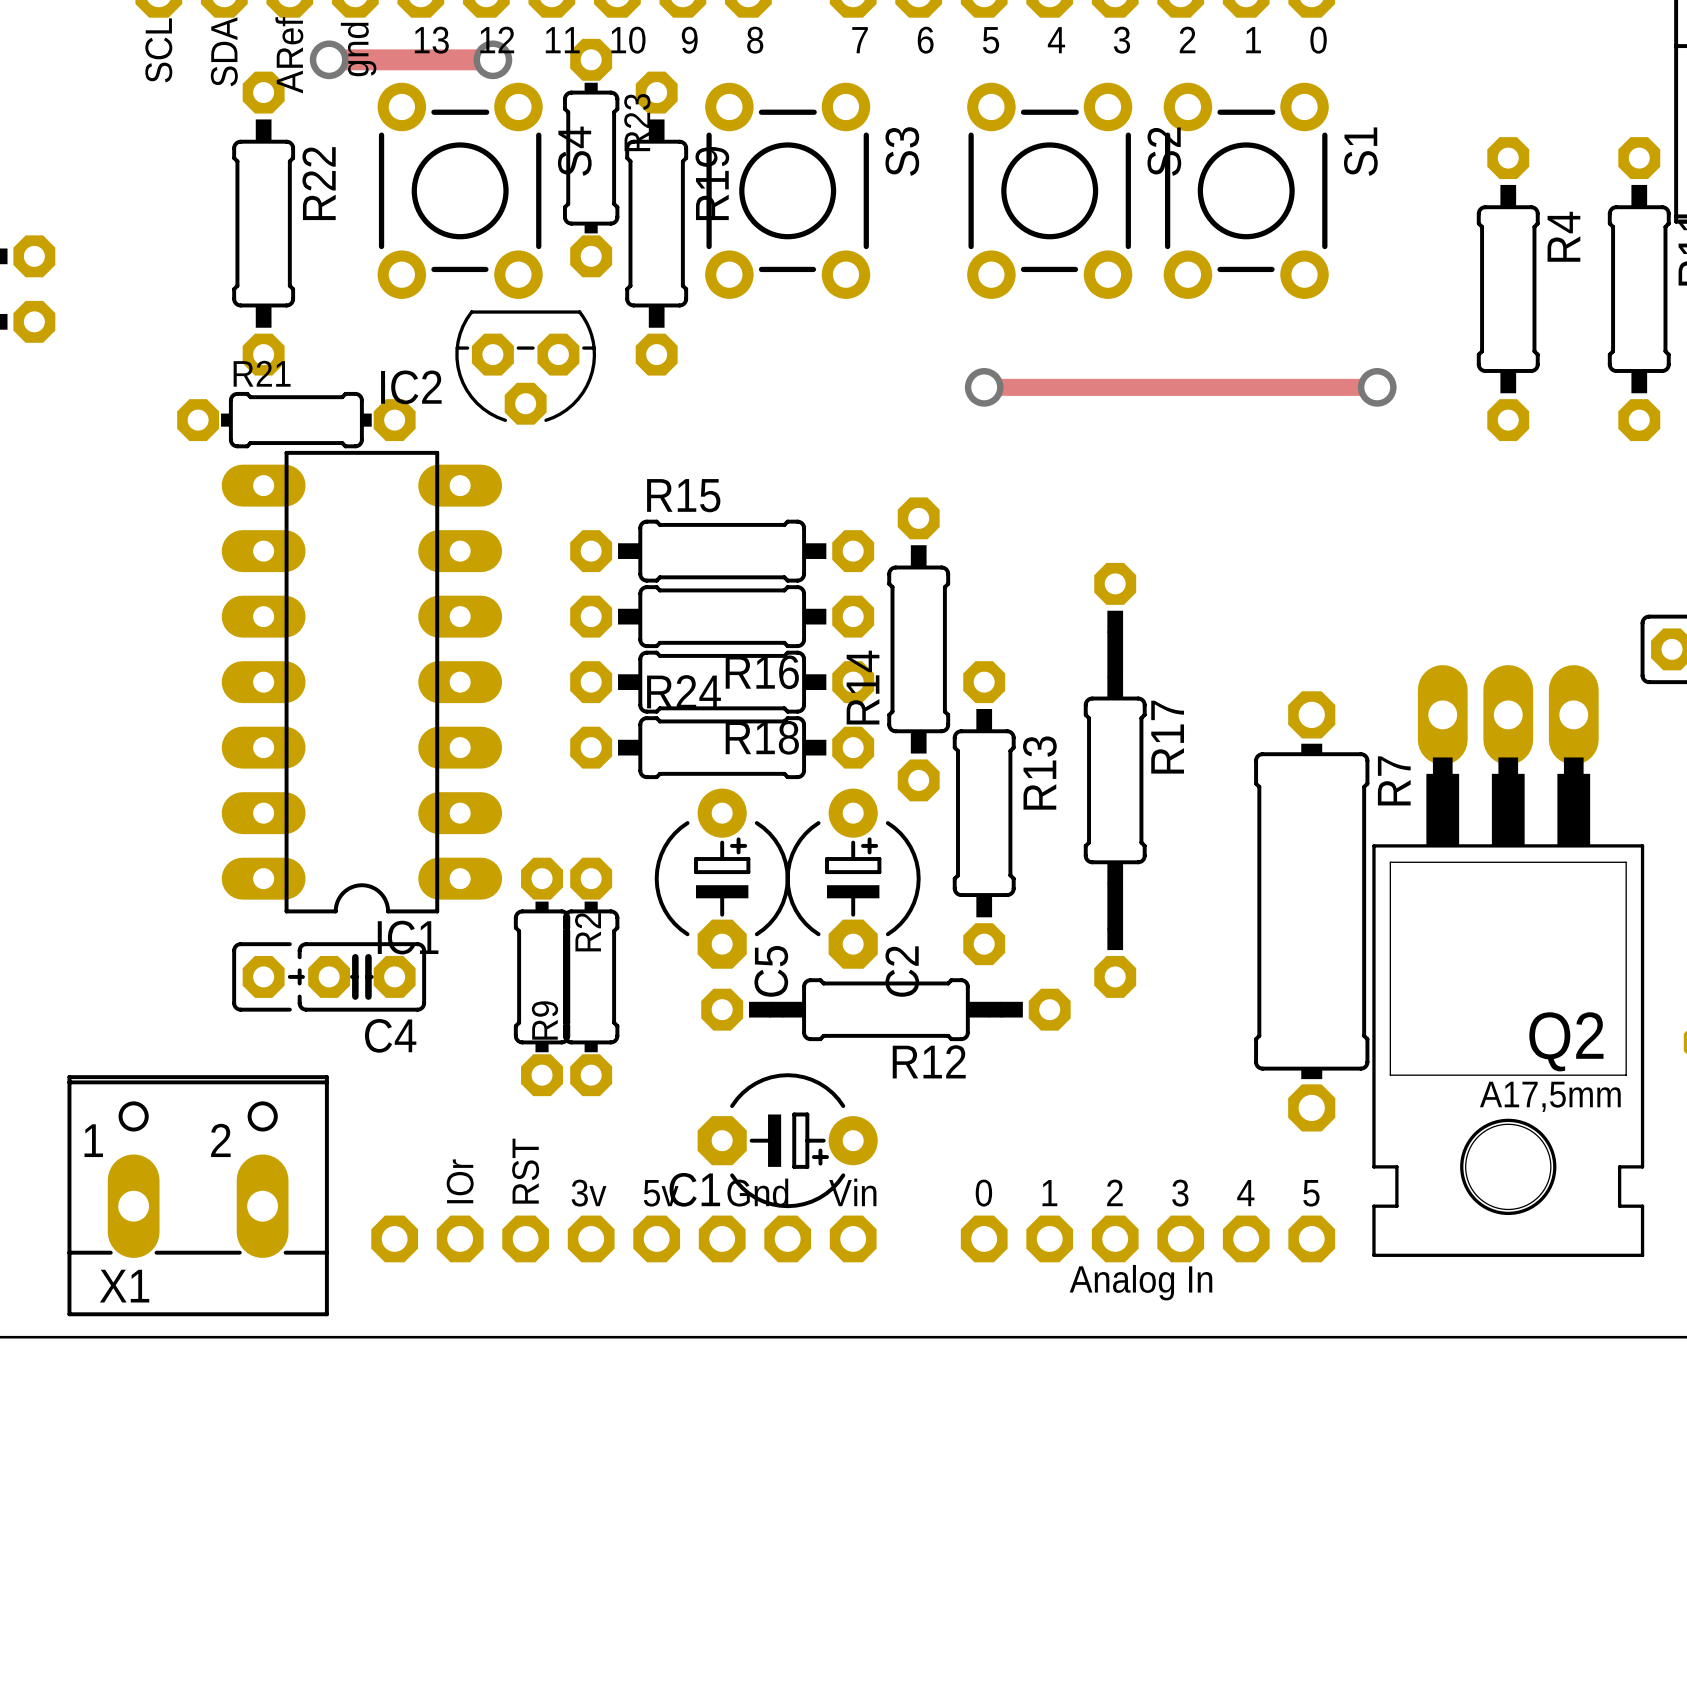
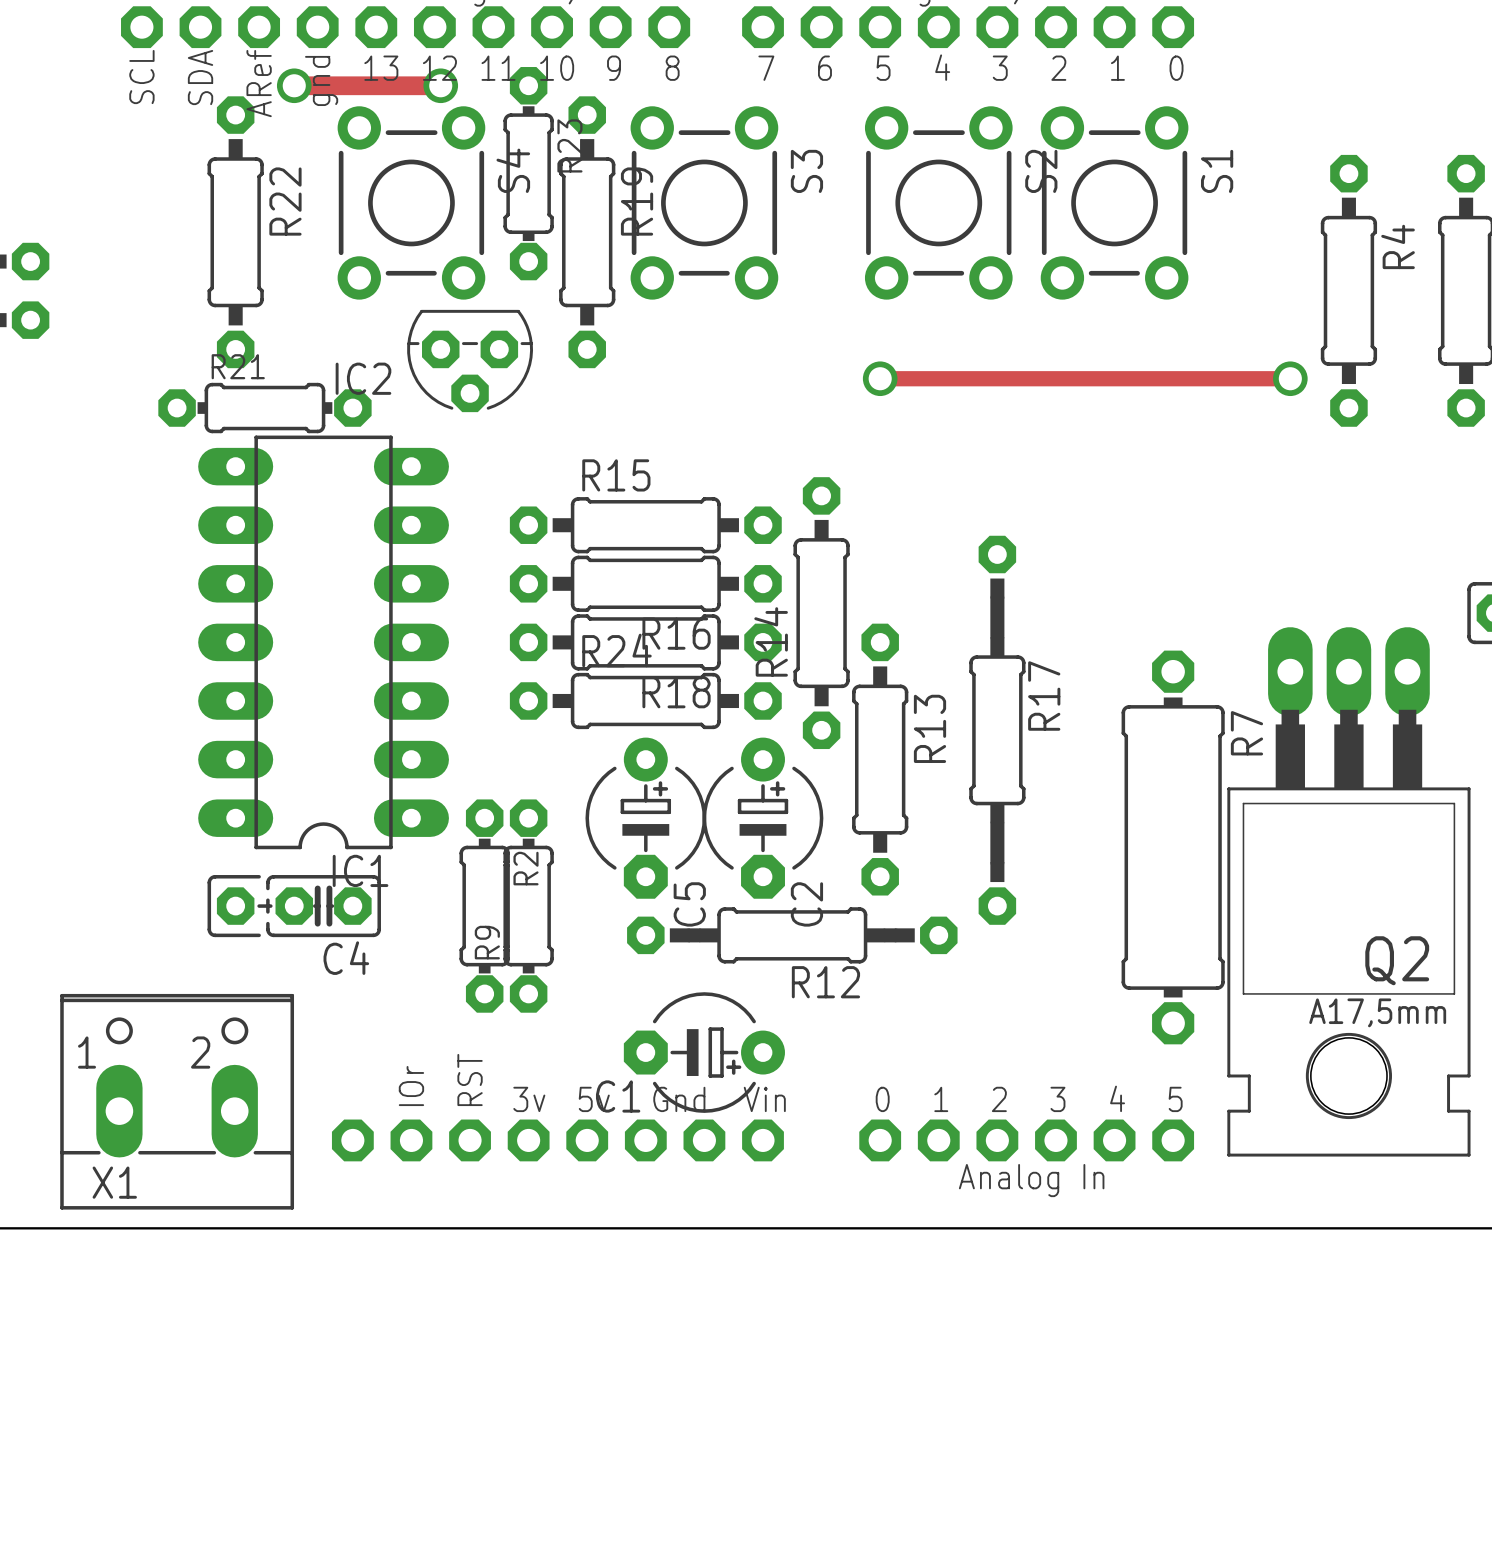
track: none -> (1231, 378) (1290, 378)
via position: (1377, 387) -> (1290, 378)

